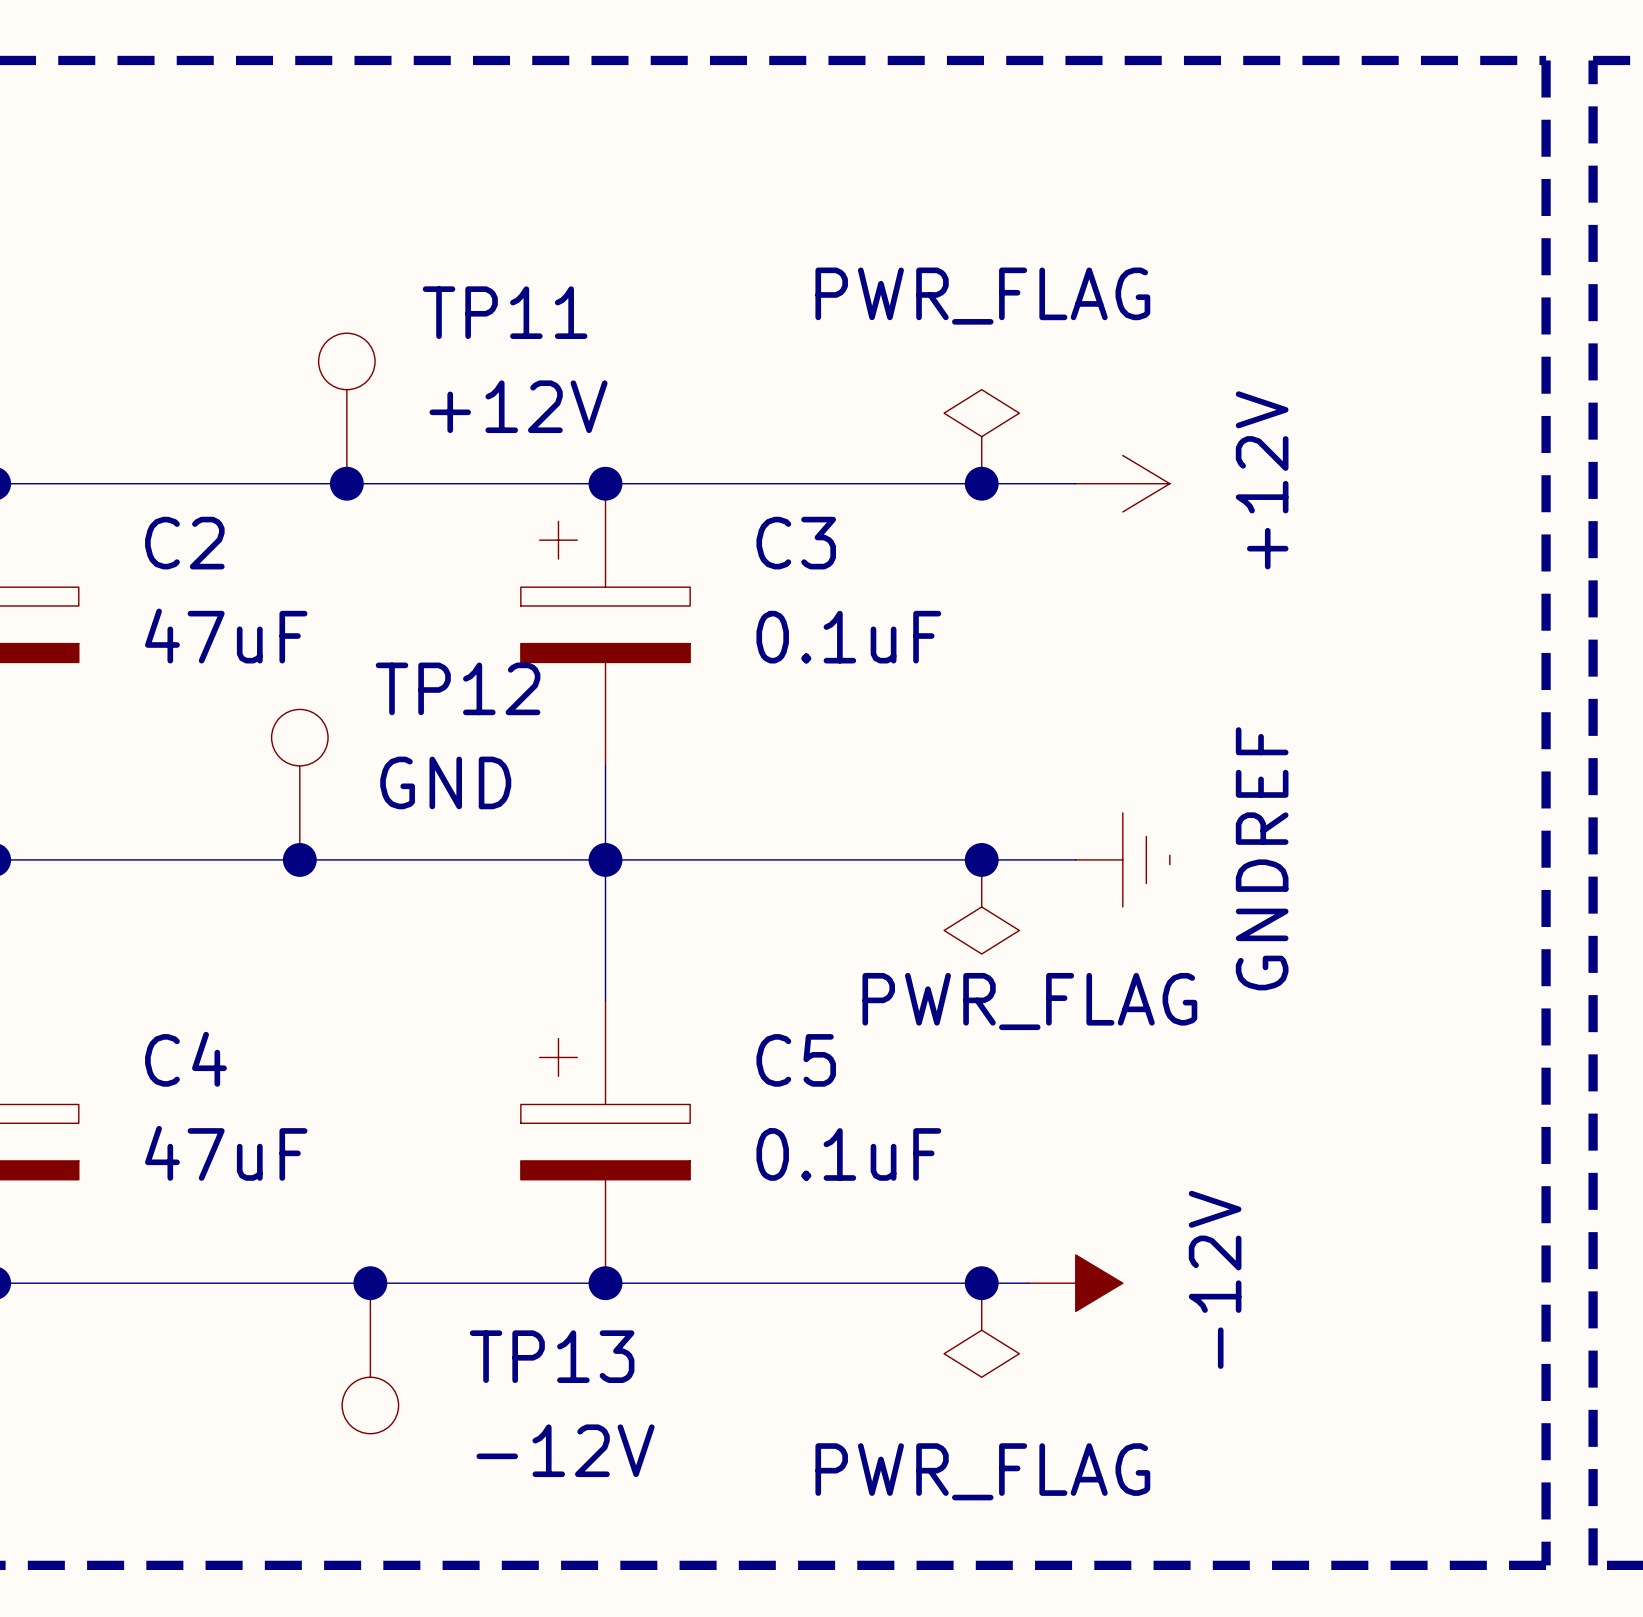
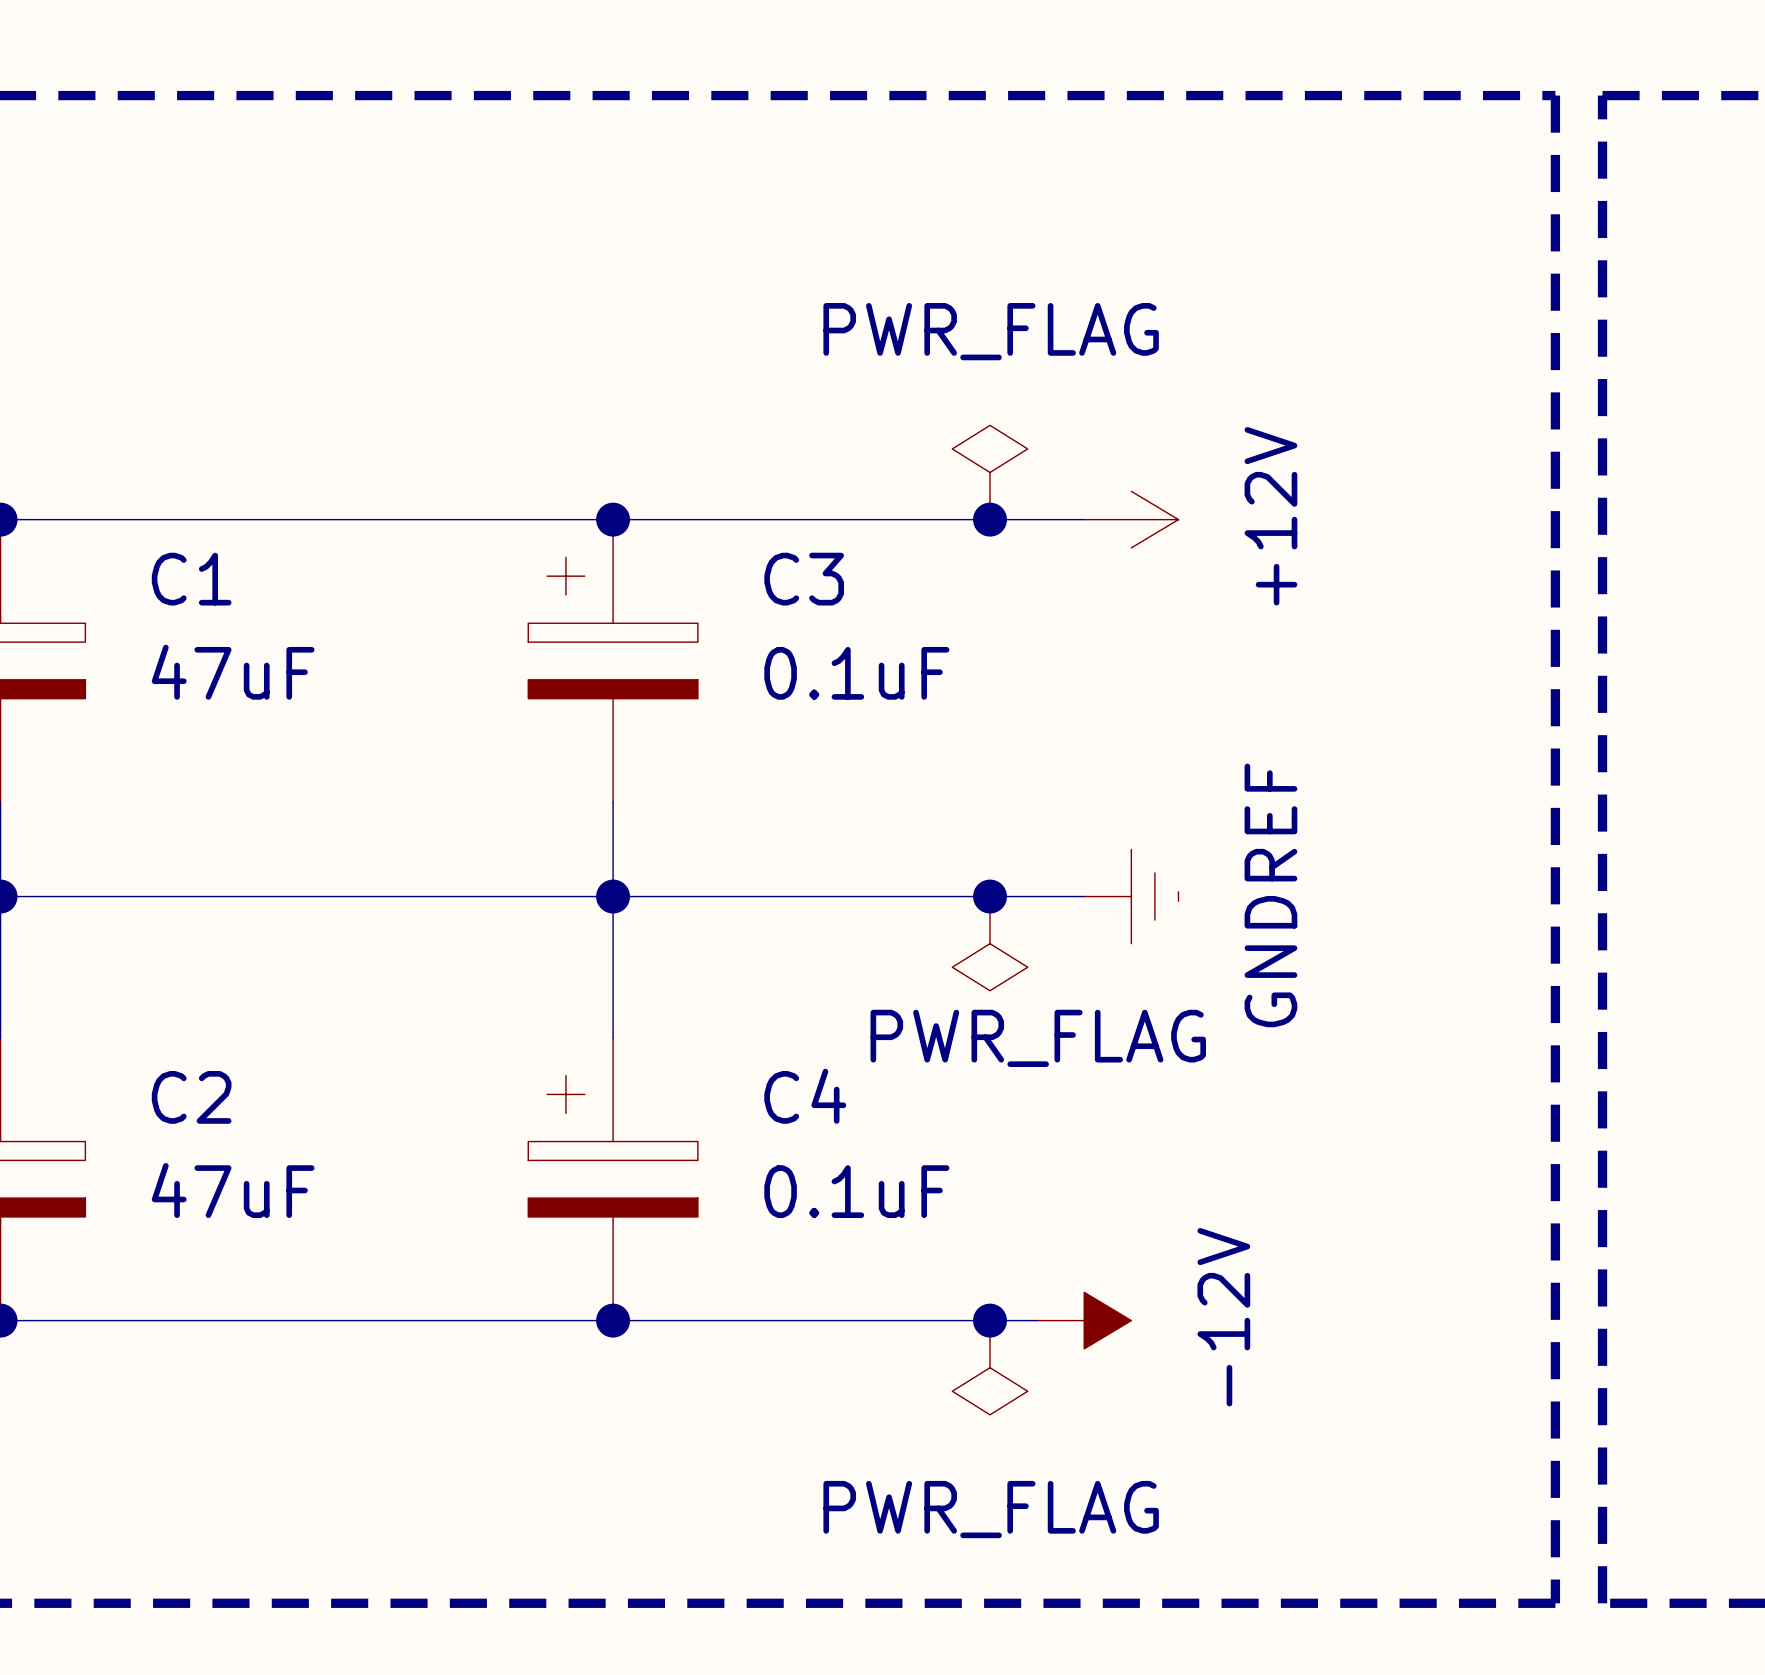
TP11: +12V (346, 408) -> none
junction: (346, 483) -> none
C2 name: C2 (184, 543) -> C1 (191, 579)
TP12: GND (299, 784) -> none
junction: (299, 859) -> none
C4 name: C4 (185, 1059) -> C2 (191, 1097)
C5 name: C5 (796, 1060) -> C4 (805, 1096)
junction: (370, 1283) -> none
TP13: -12V (370, 1358) -> none

